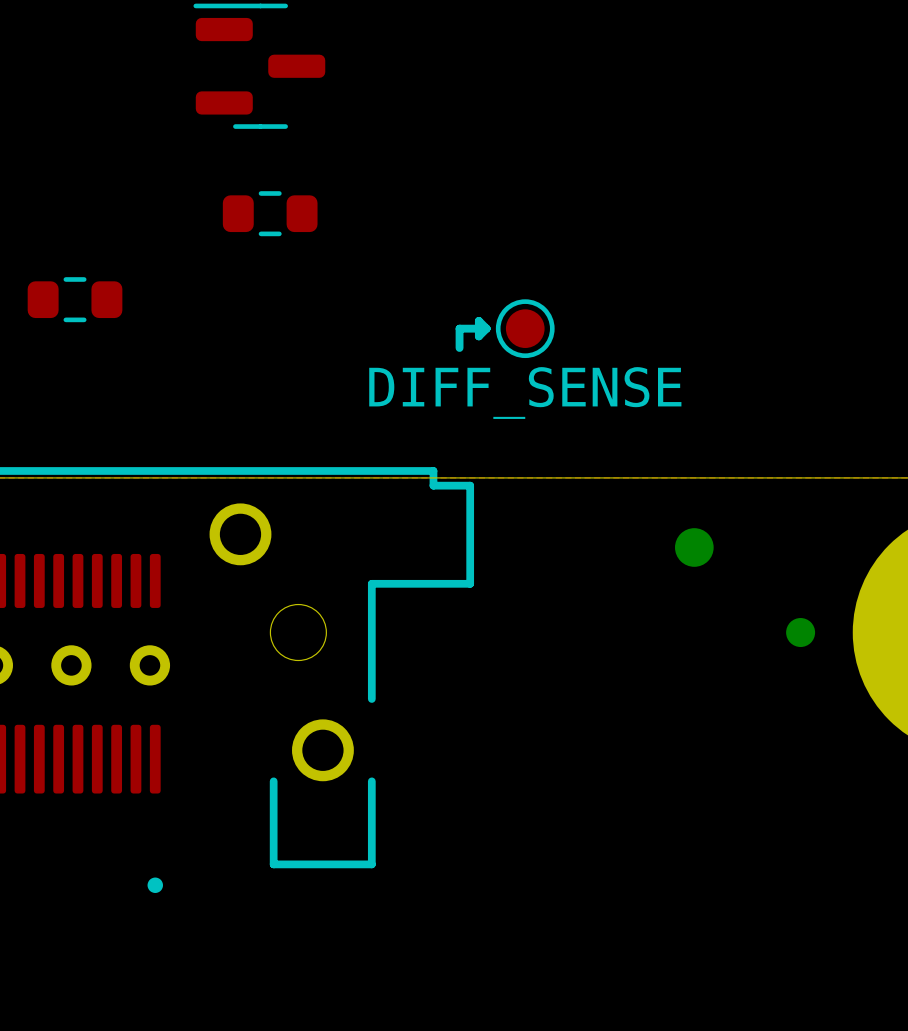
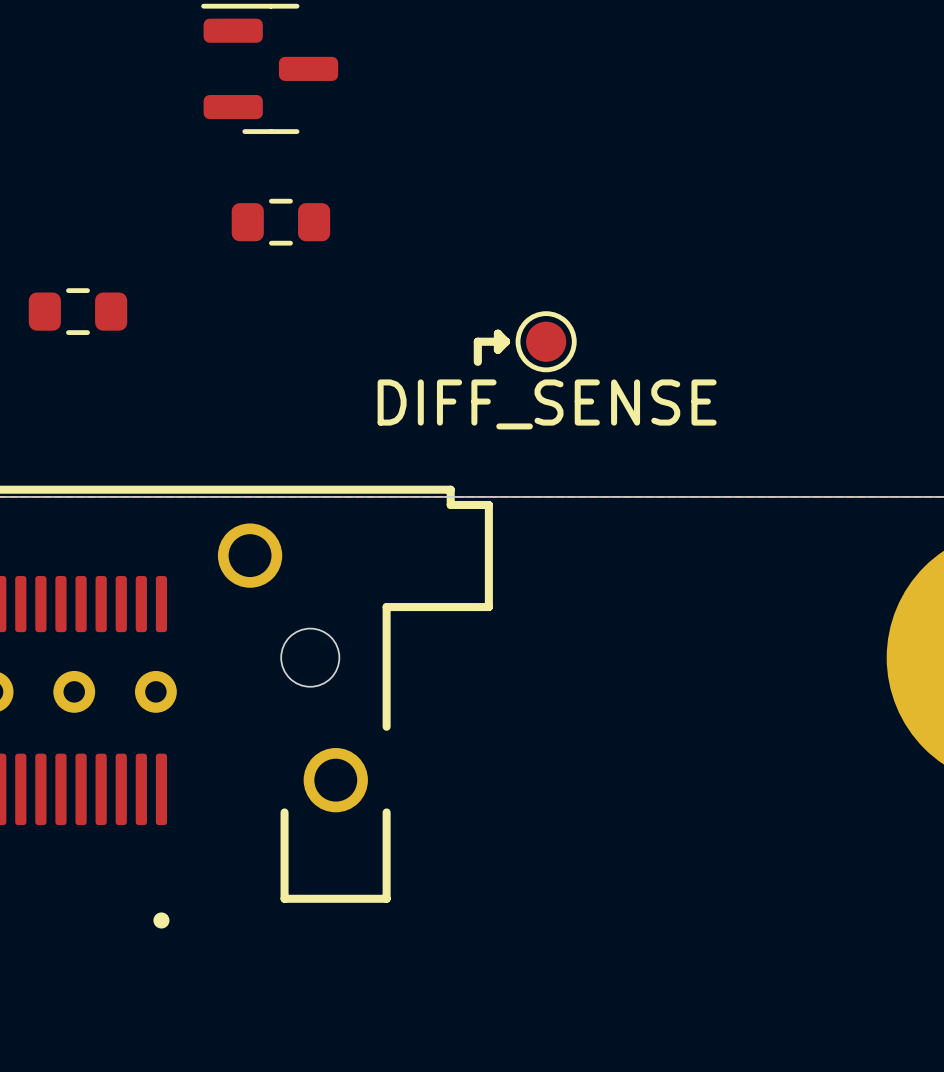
part: (694, 547) -> none
part: (800, 632) -> none

